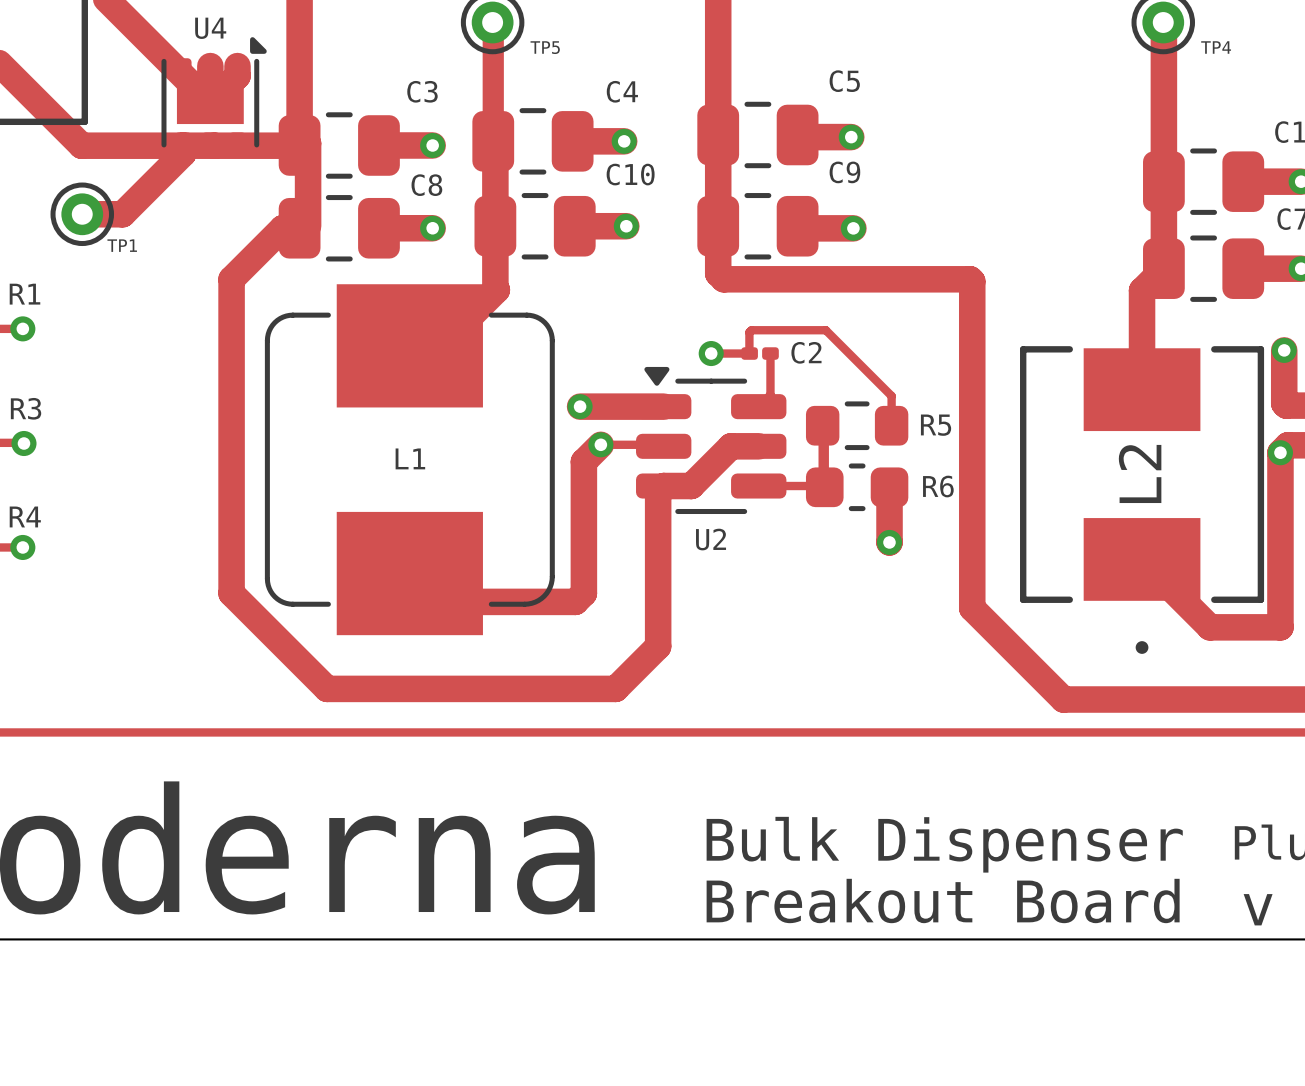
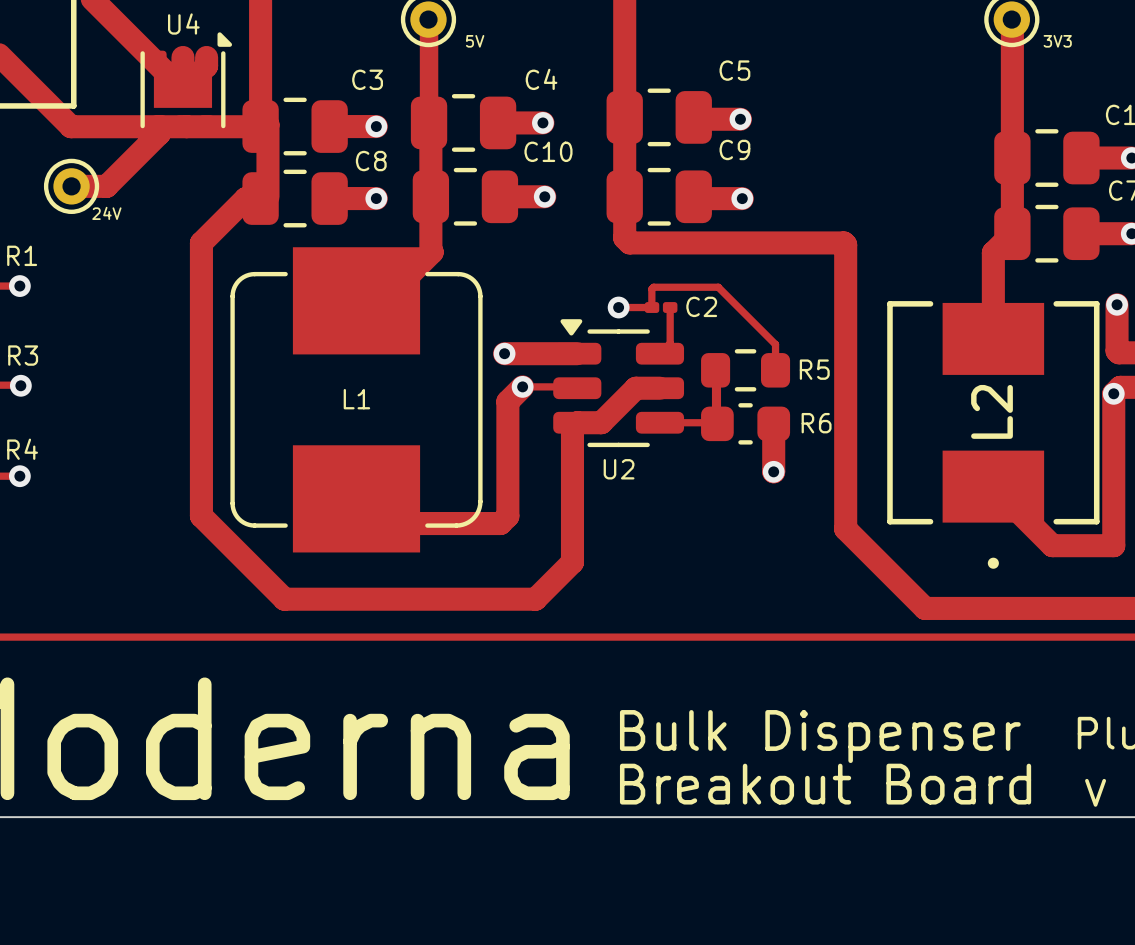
TP5 name: TP5 (545, 47) -> 5V (475, 41)
TP4 name: TP4 (1216, 47) -> 3V3 (1057, 41)
TP1 name: TP1 (122, 245) -> 24V (106, 213)

